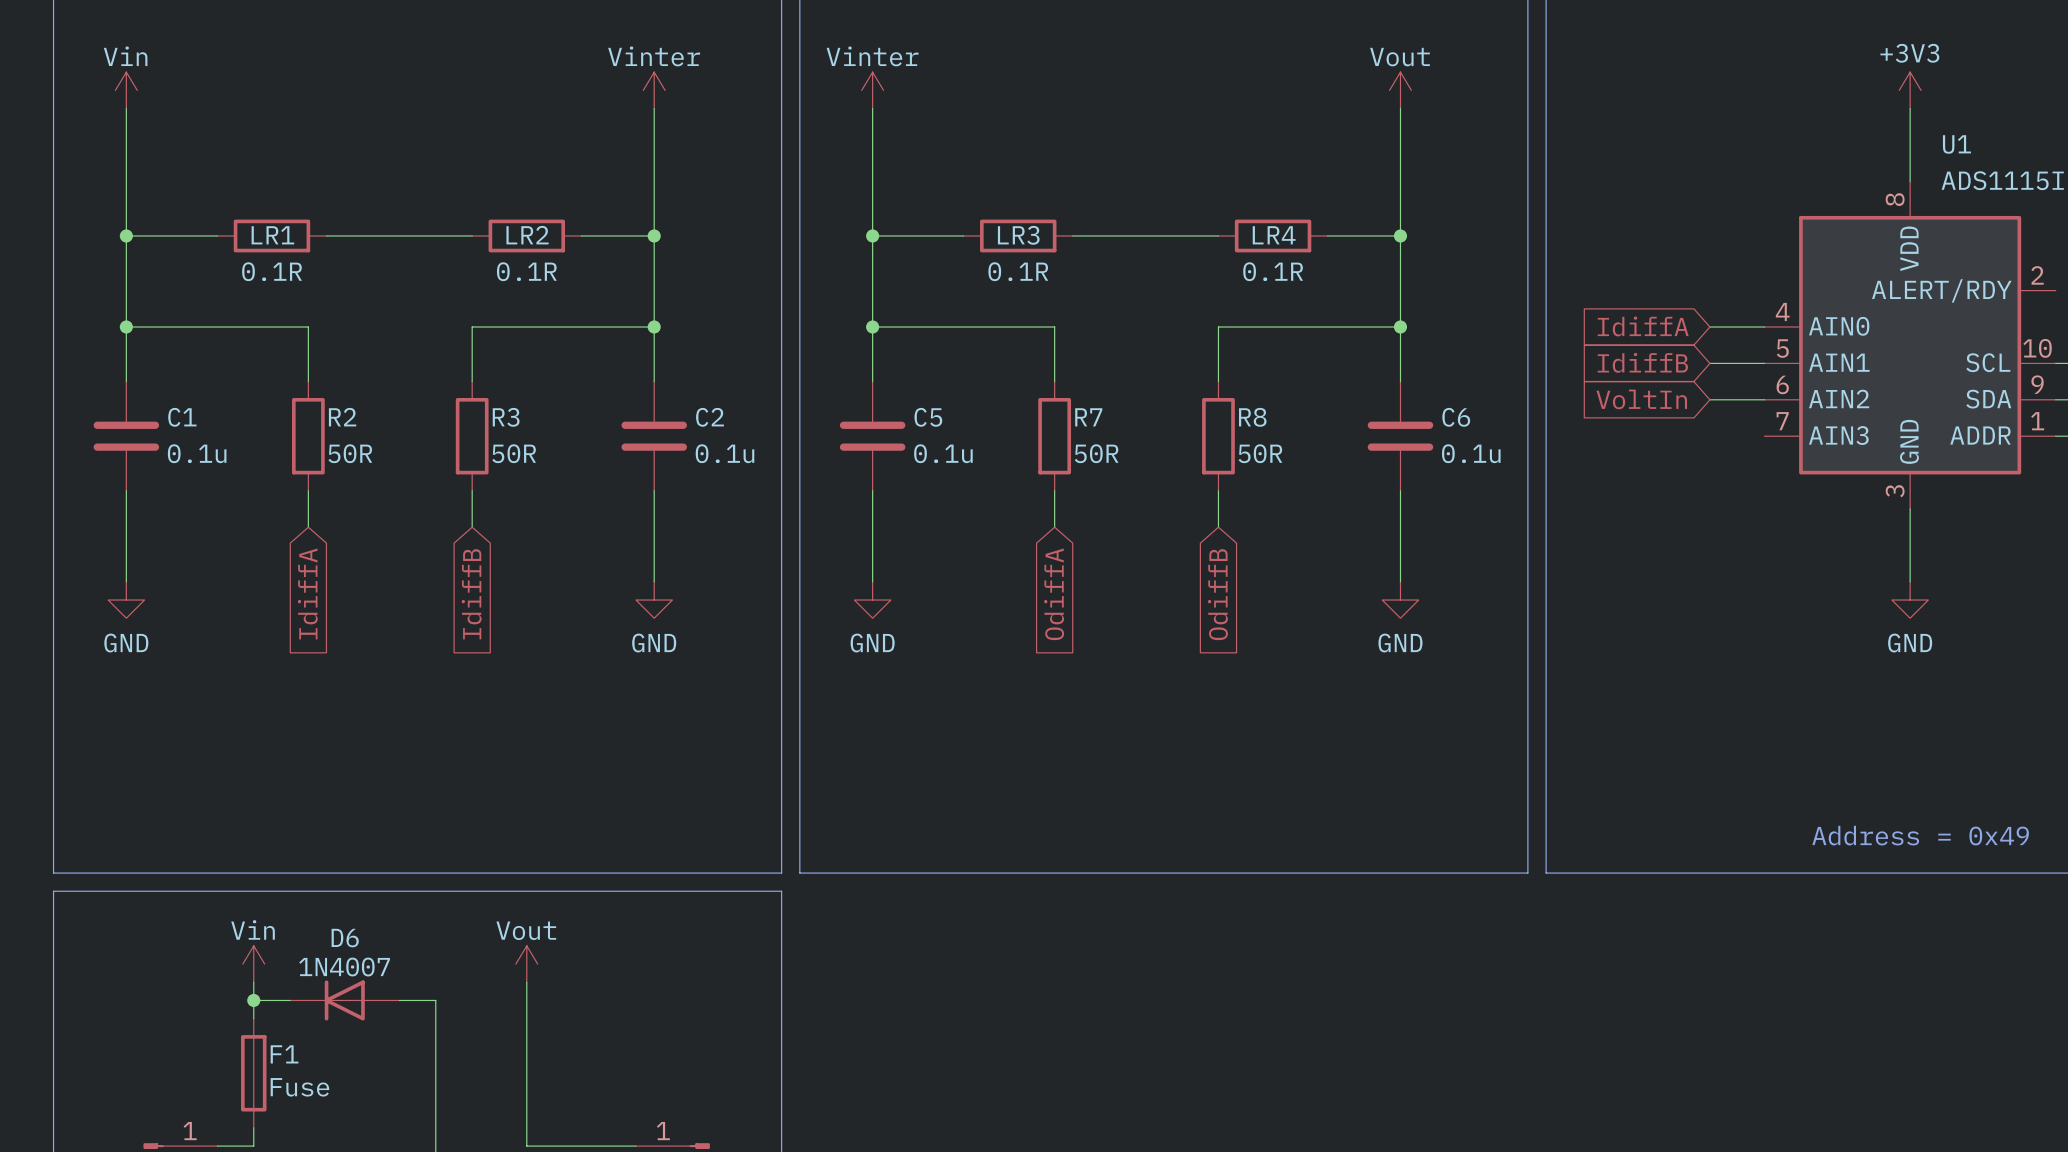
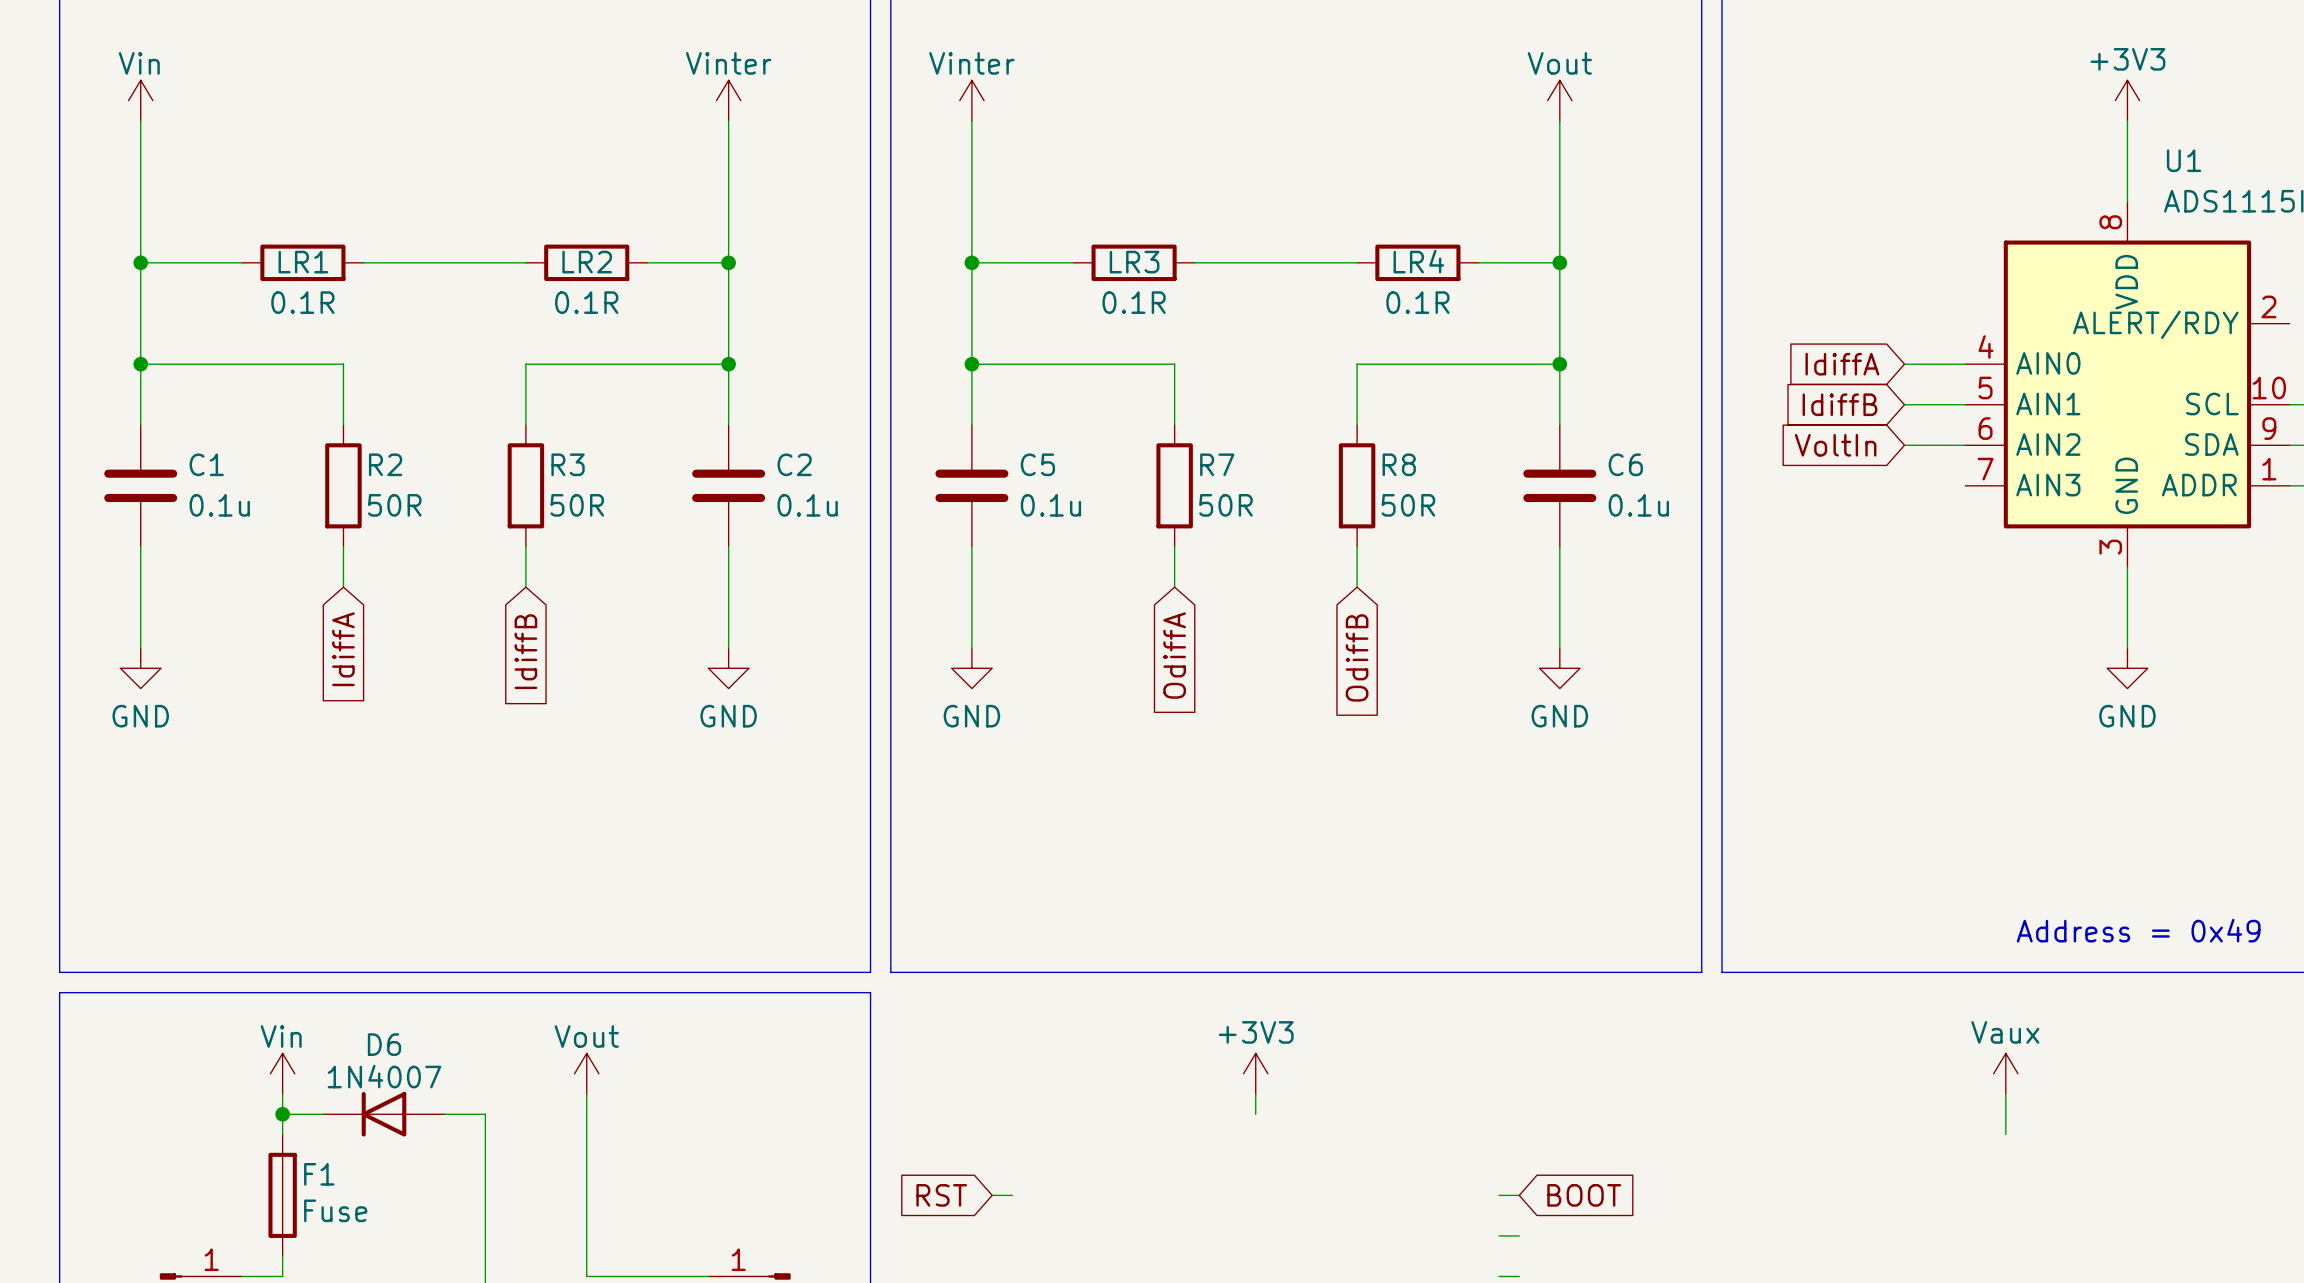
power symbol: none -> +3V3 (1255, 1073)
power symbol: none -> Vaux (2005, 1073)
wire: none -> (1255, 1094) (1255, 1114)
wire: none -> (2005, 1094) (2005, 1134)
global label: none -> RST (941, 1195)
wire: none -> (992, 1195) (1012, 1195)
wire: none -> (1498, 1195) (1519, 1195)
global label: none -> BOOT (1584, 1195)
wire: none -> (1498, 1235) (1519, 1235)
wire: none -> (1498, 1276) (1519, 1276)

